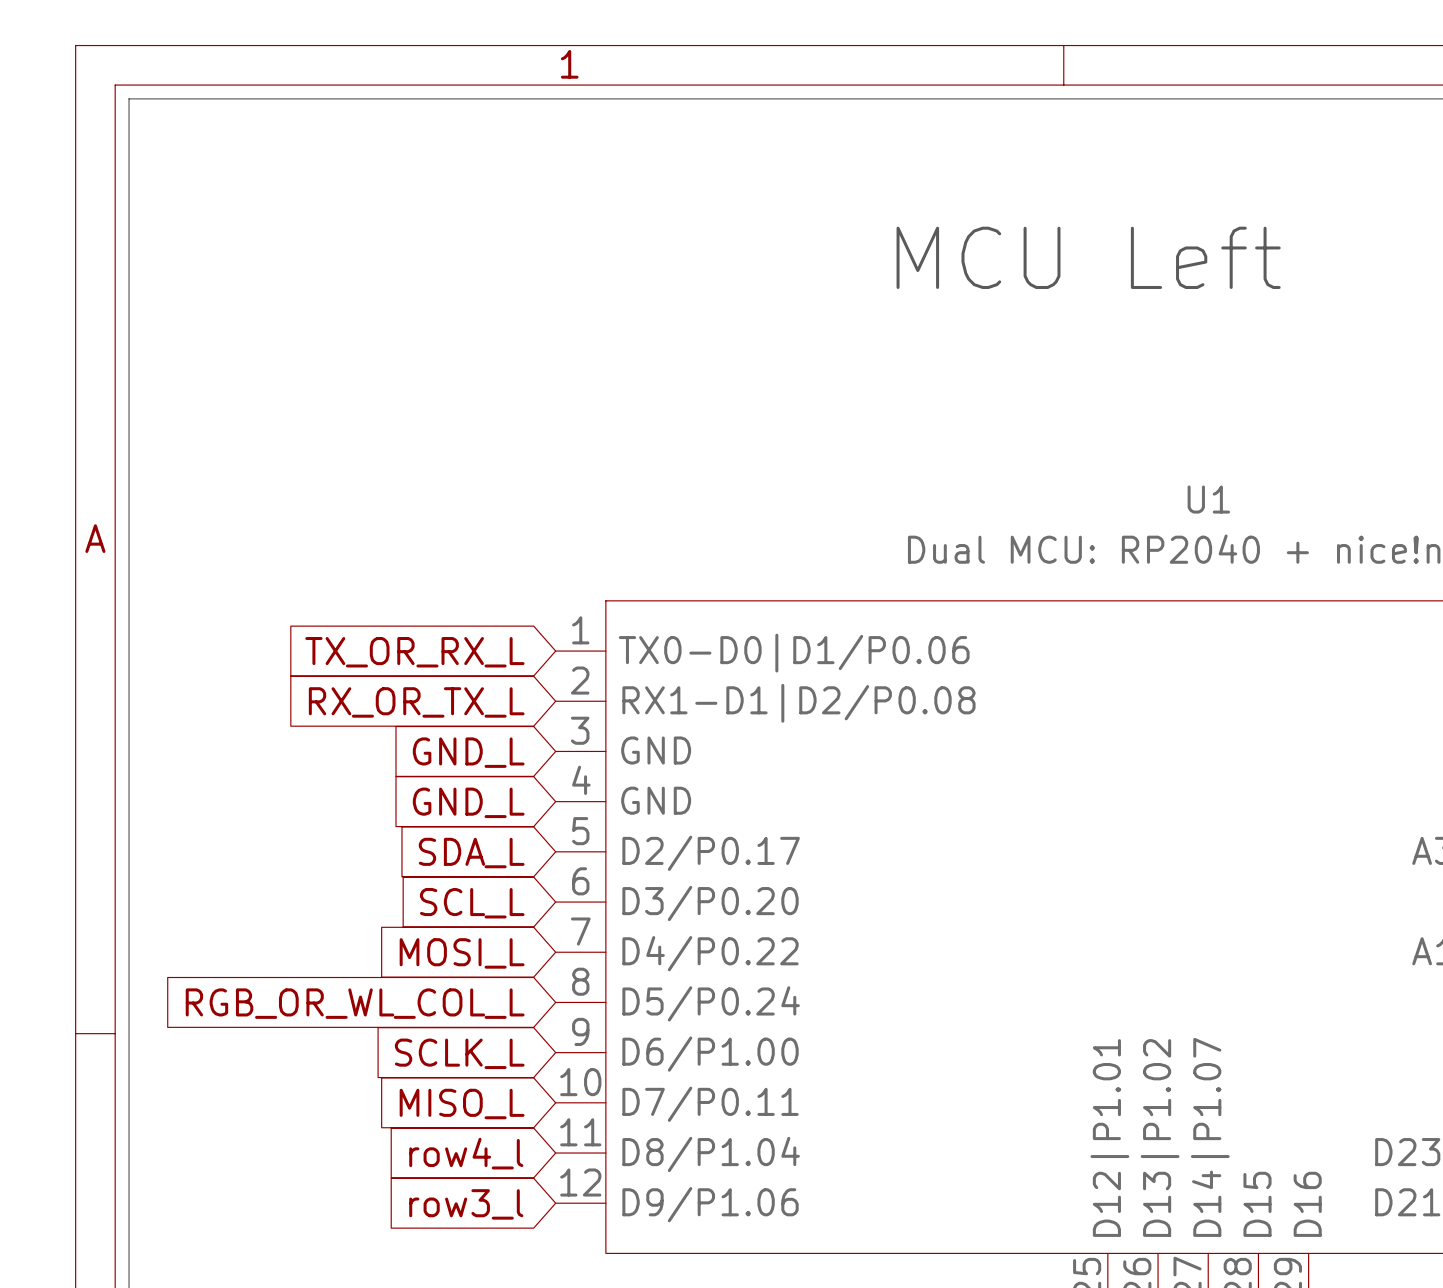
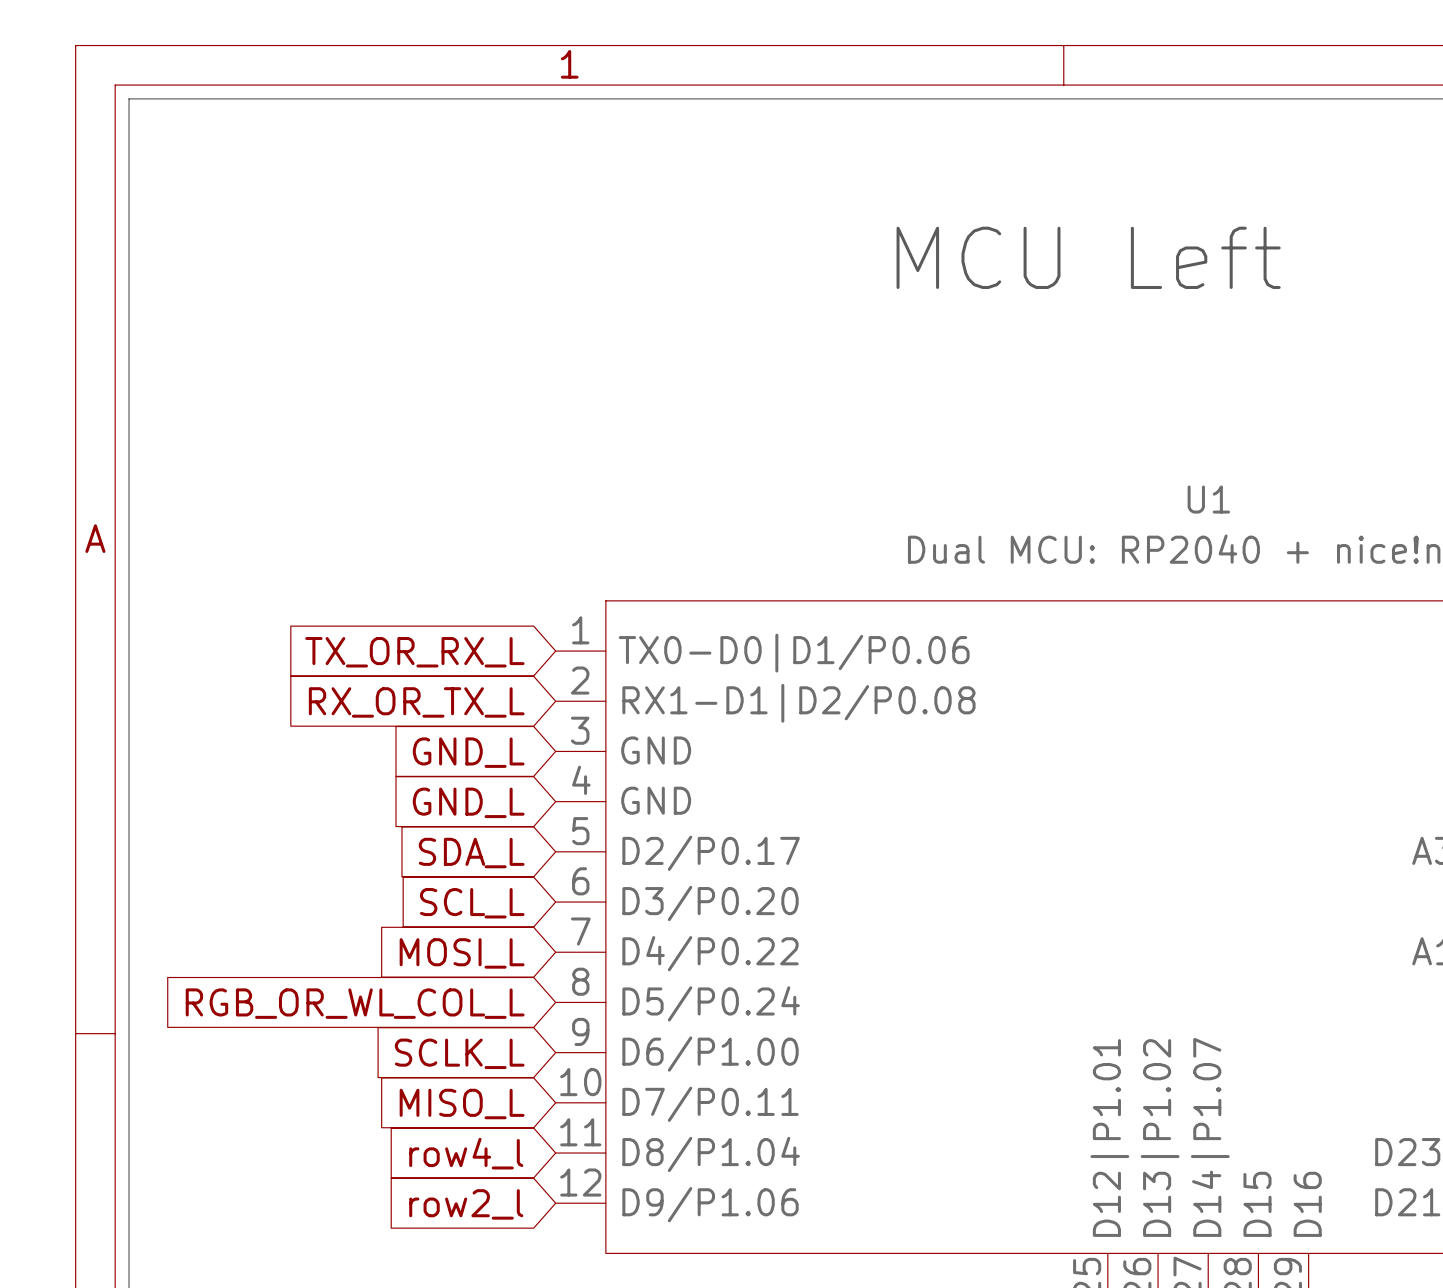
global label: row3_l (466, 1204) -> row2_l (466, 1204)

